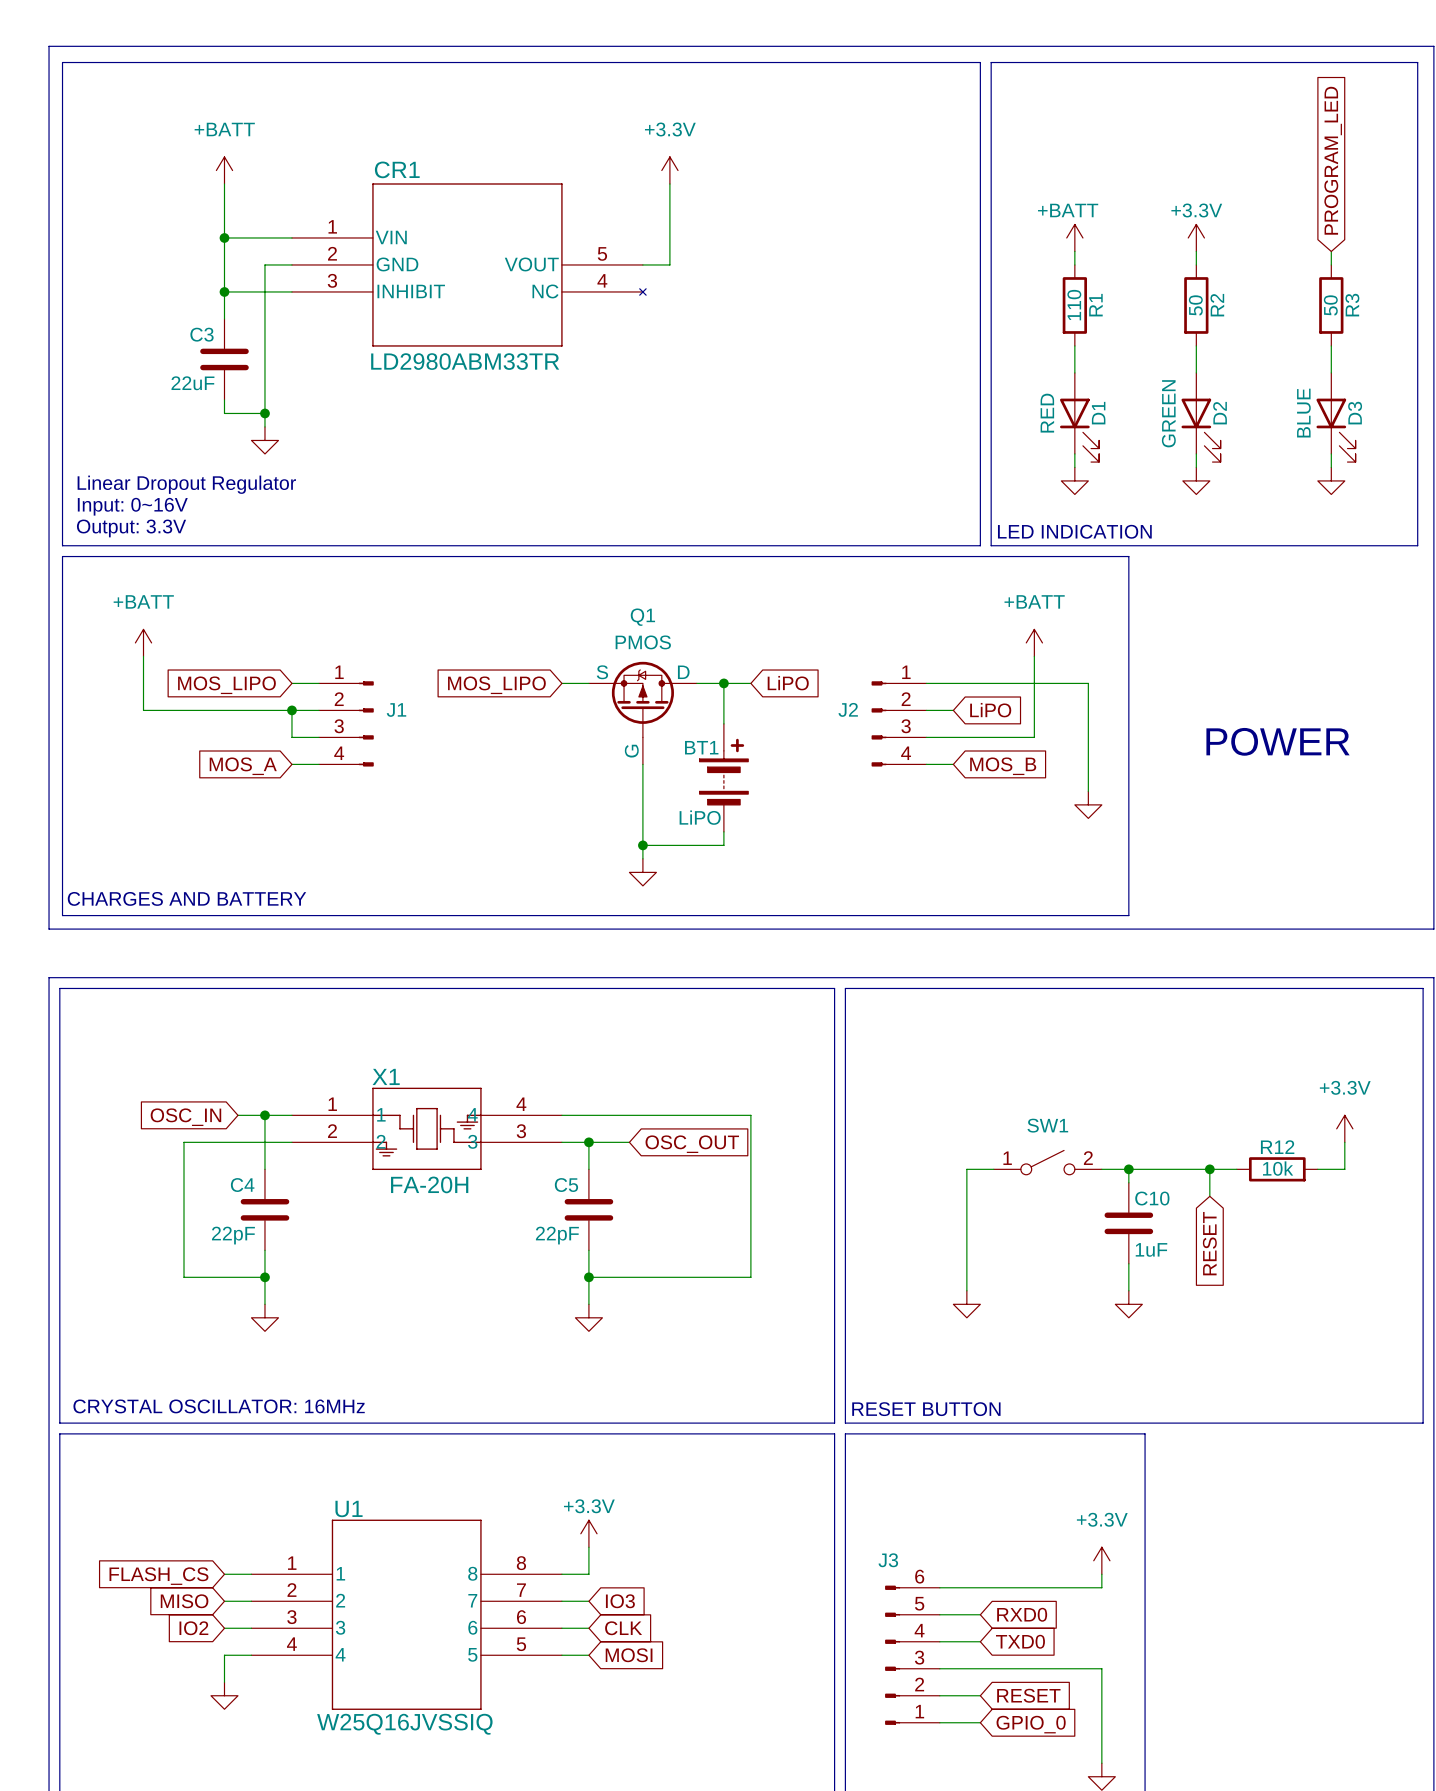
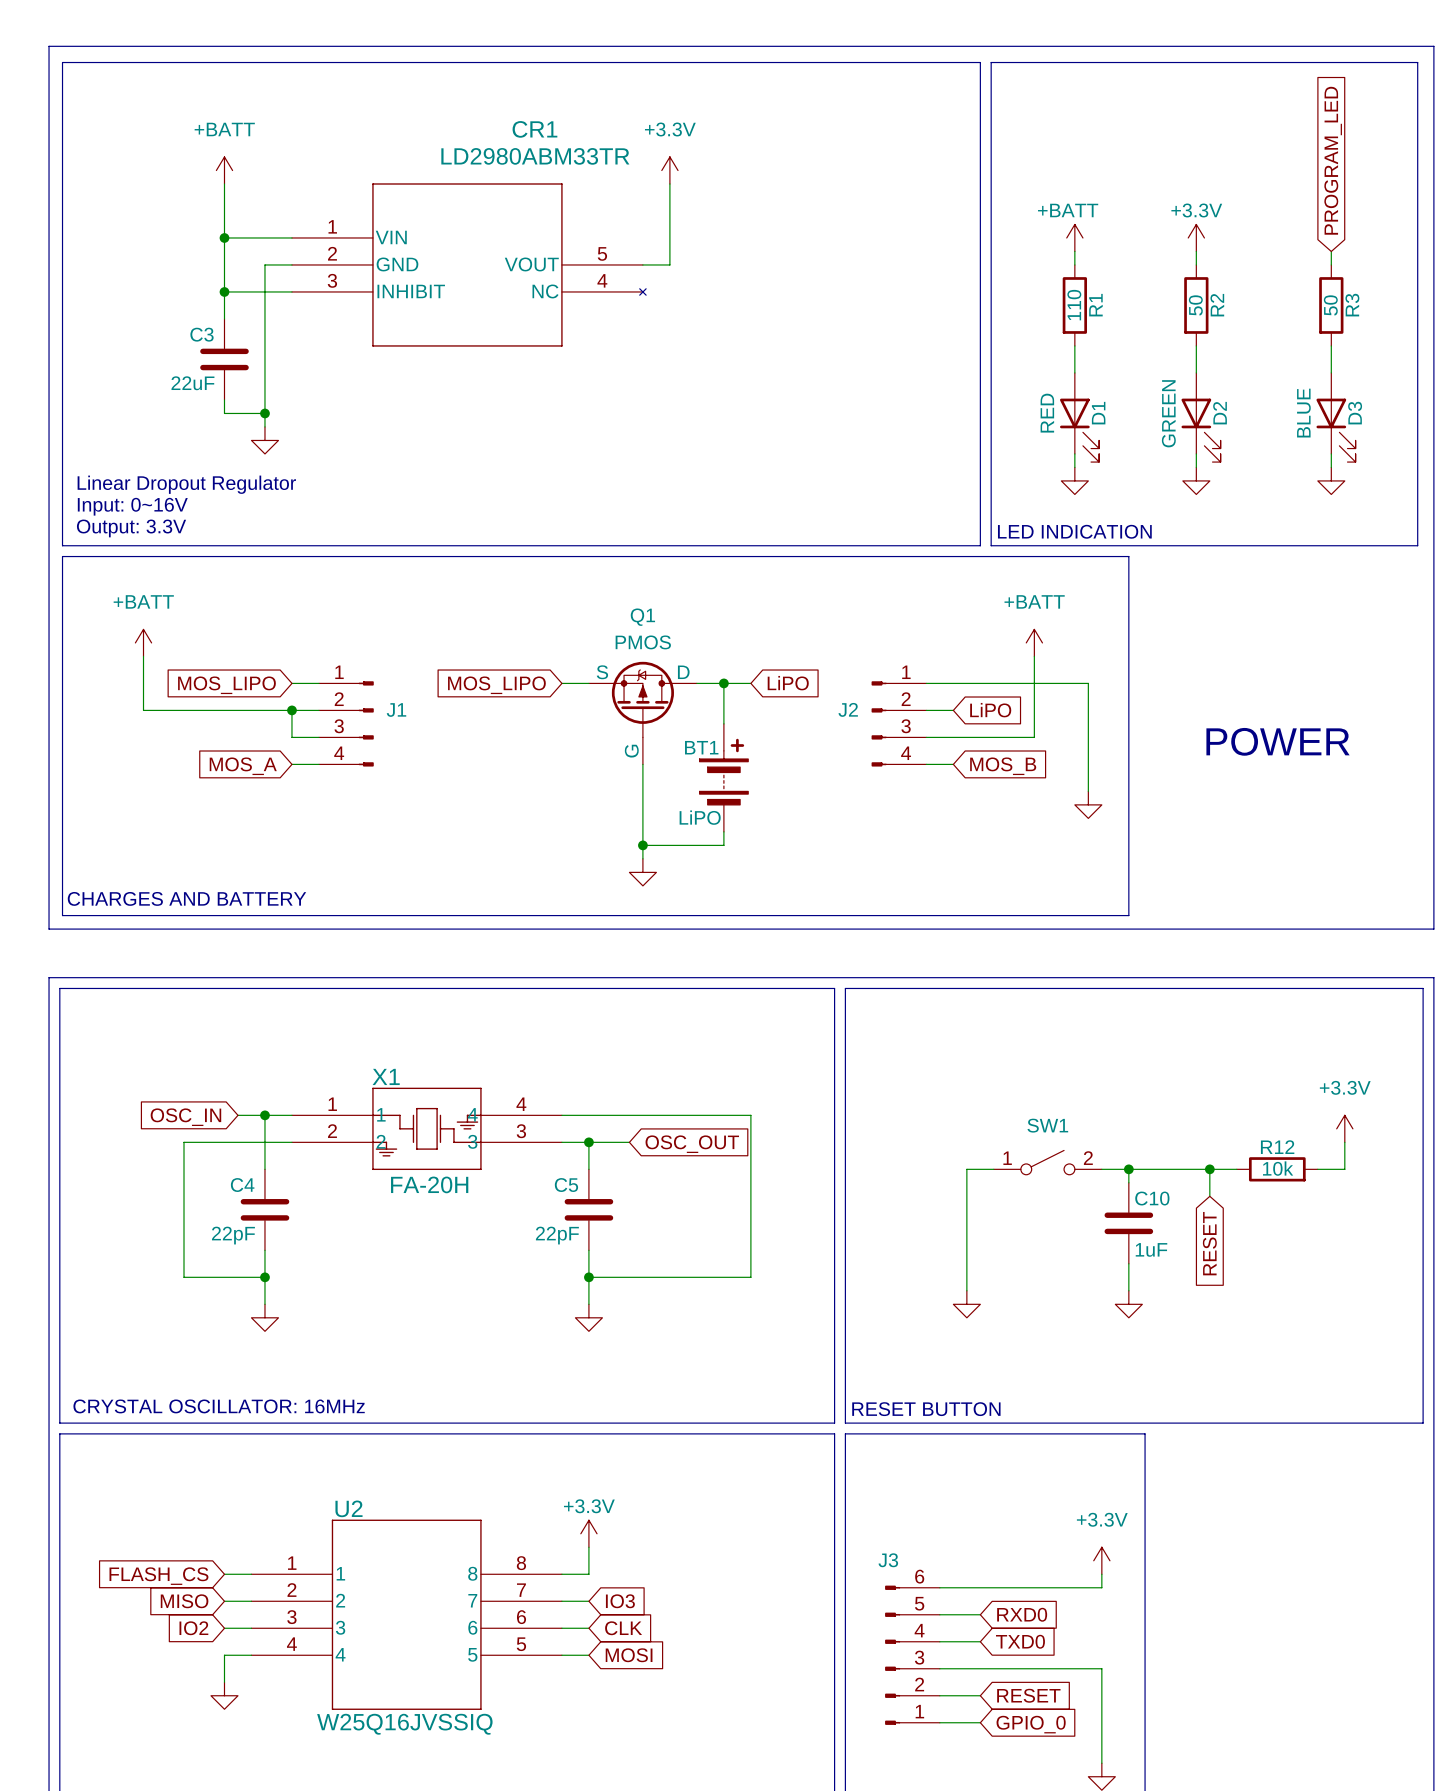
CR1 name position: CR1 (397, 169) -> CR1 (534, 129)
CR1 value position: LD2980ABM33TR (465, 361) -> LD2980ABM33TR (535, 156)
U1 name: U1 (349, 1508) -> U2 (348, 1508)

